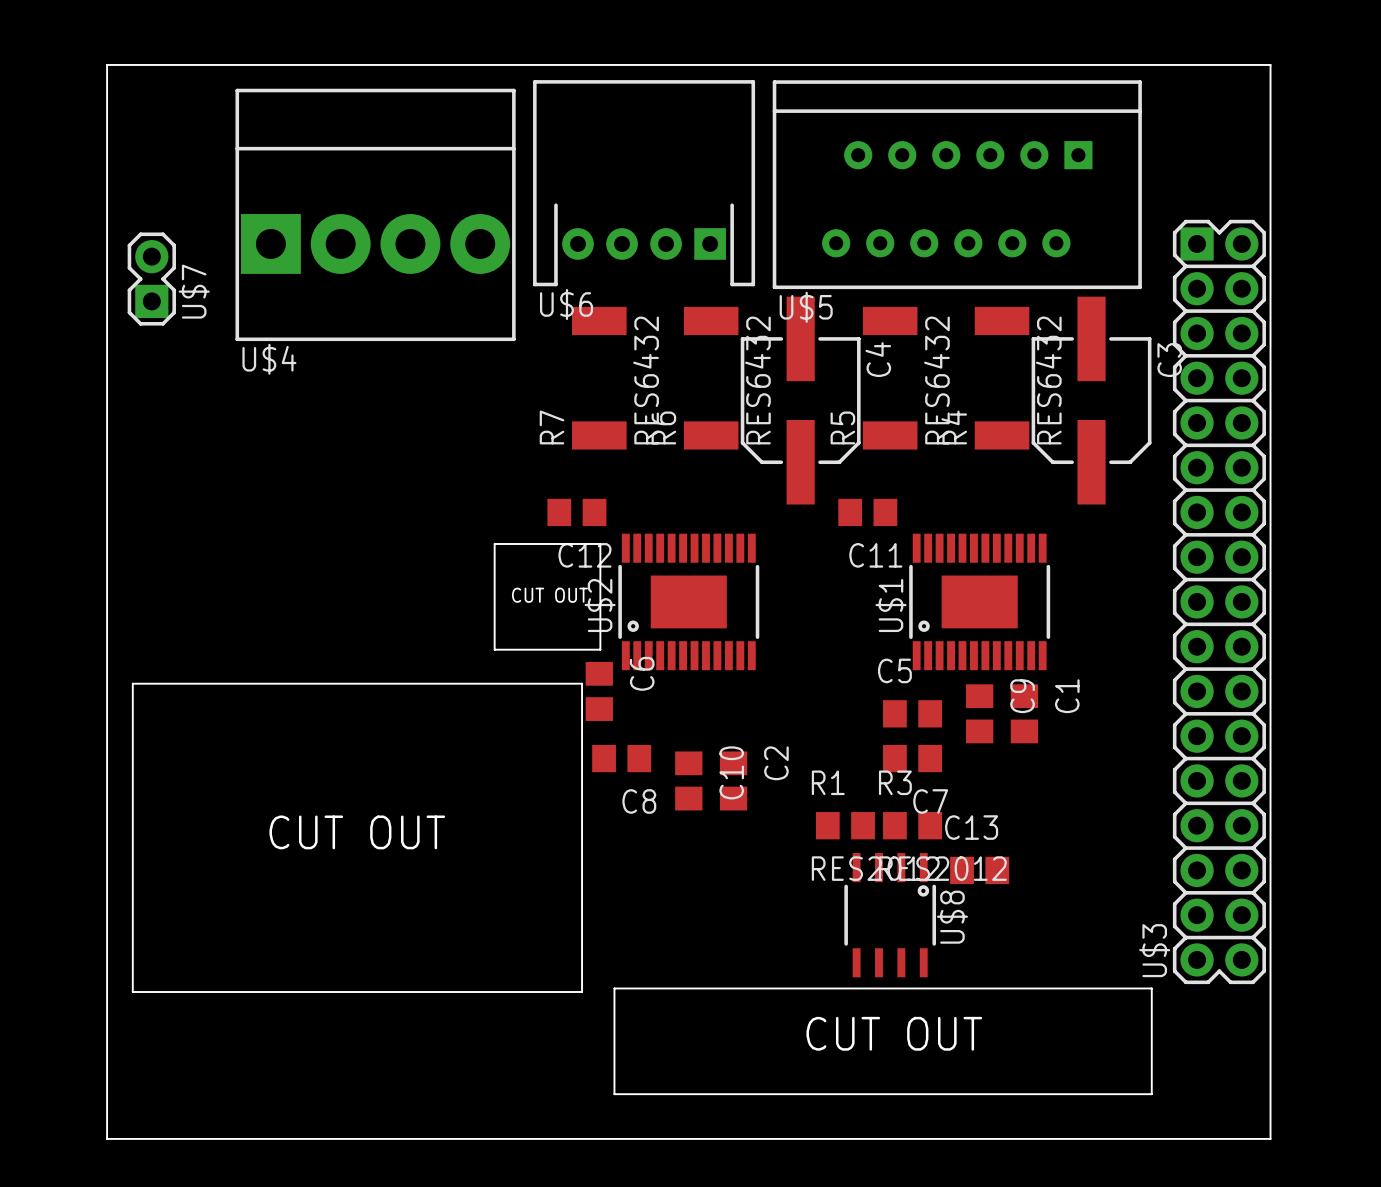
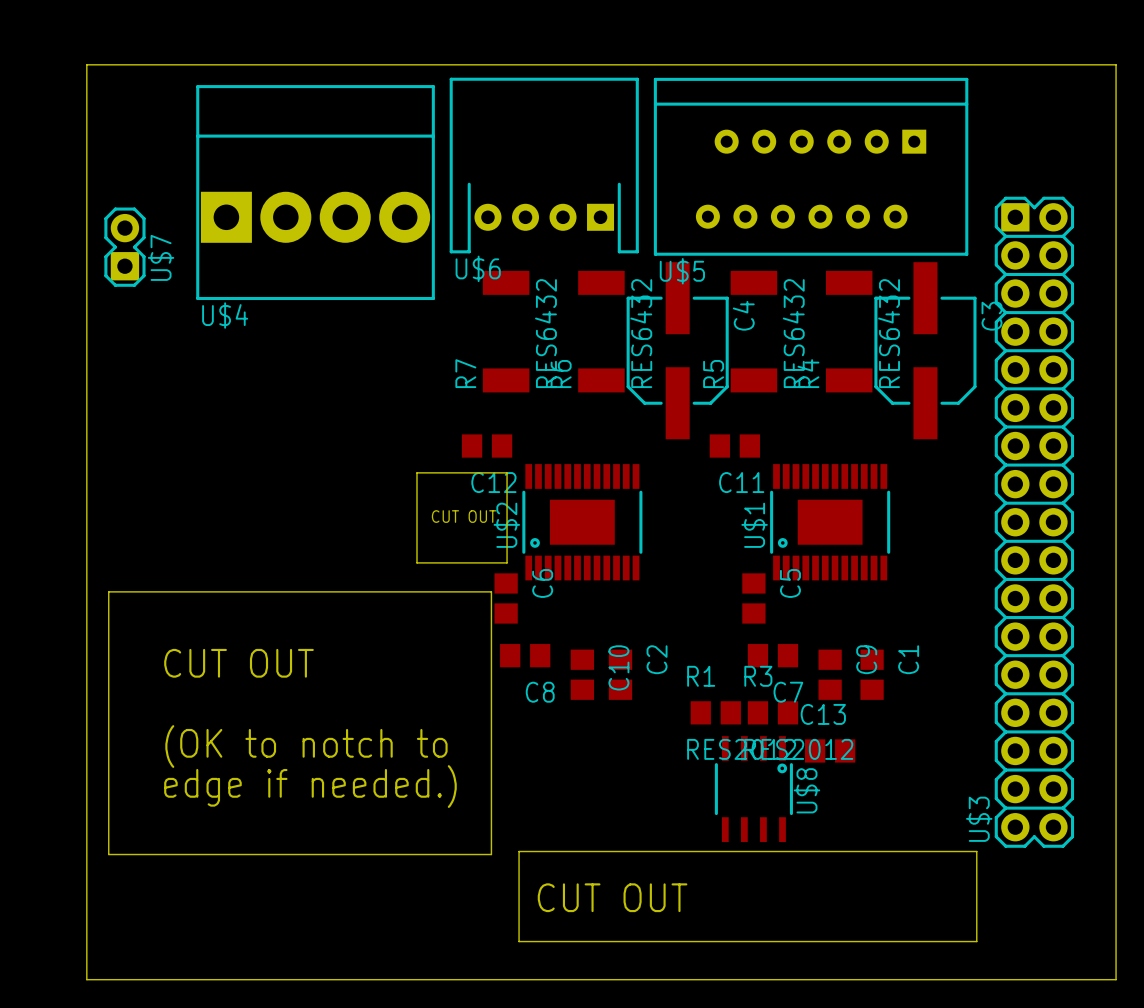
board edge: (1270, 64) (1270, 1138) -> (1077, 64) (1116, 64) (1116, 979) (1077, 979)
C5 rotation: 0° (912, 713) -> 90° clockwise (753, 598)
C9 position: (979, 713) -> (830, 674)
C1 position: (1024, 713) -> (872, 674)
text position: CUT OUT (357, 832) -> CUT OUT (238, 663)
text: none -> (OK to notch to (306, 746)
text: none -> edge if needed.) (310, 786)
text position: CUT OUT (894, 1033) -> CUT OUT (612, 897)

